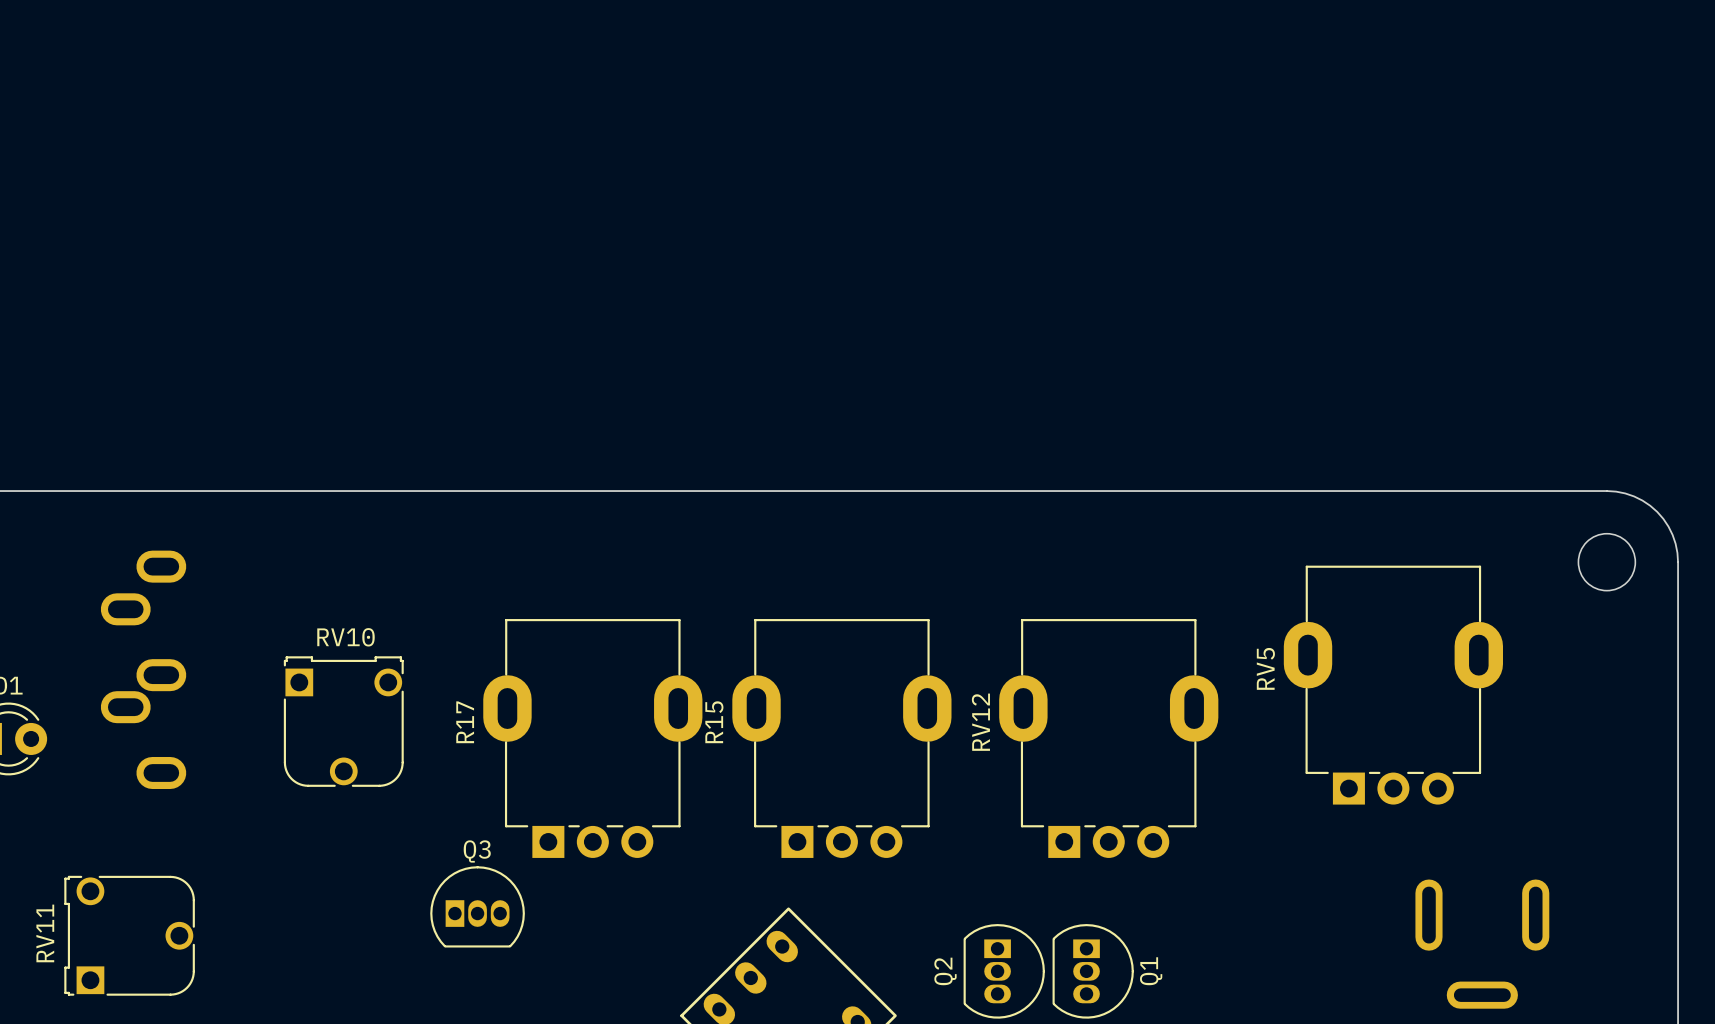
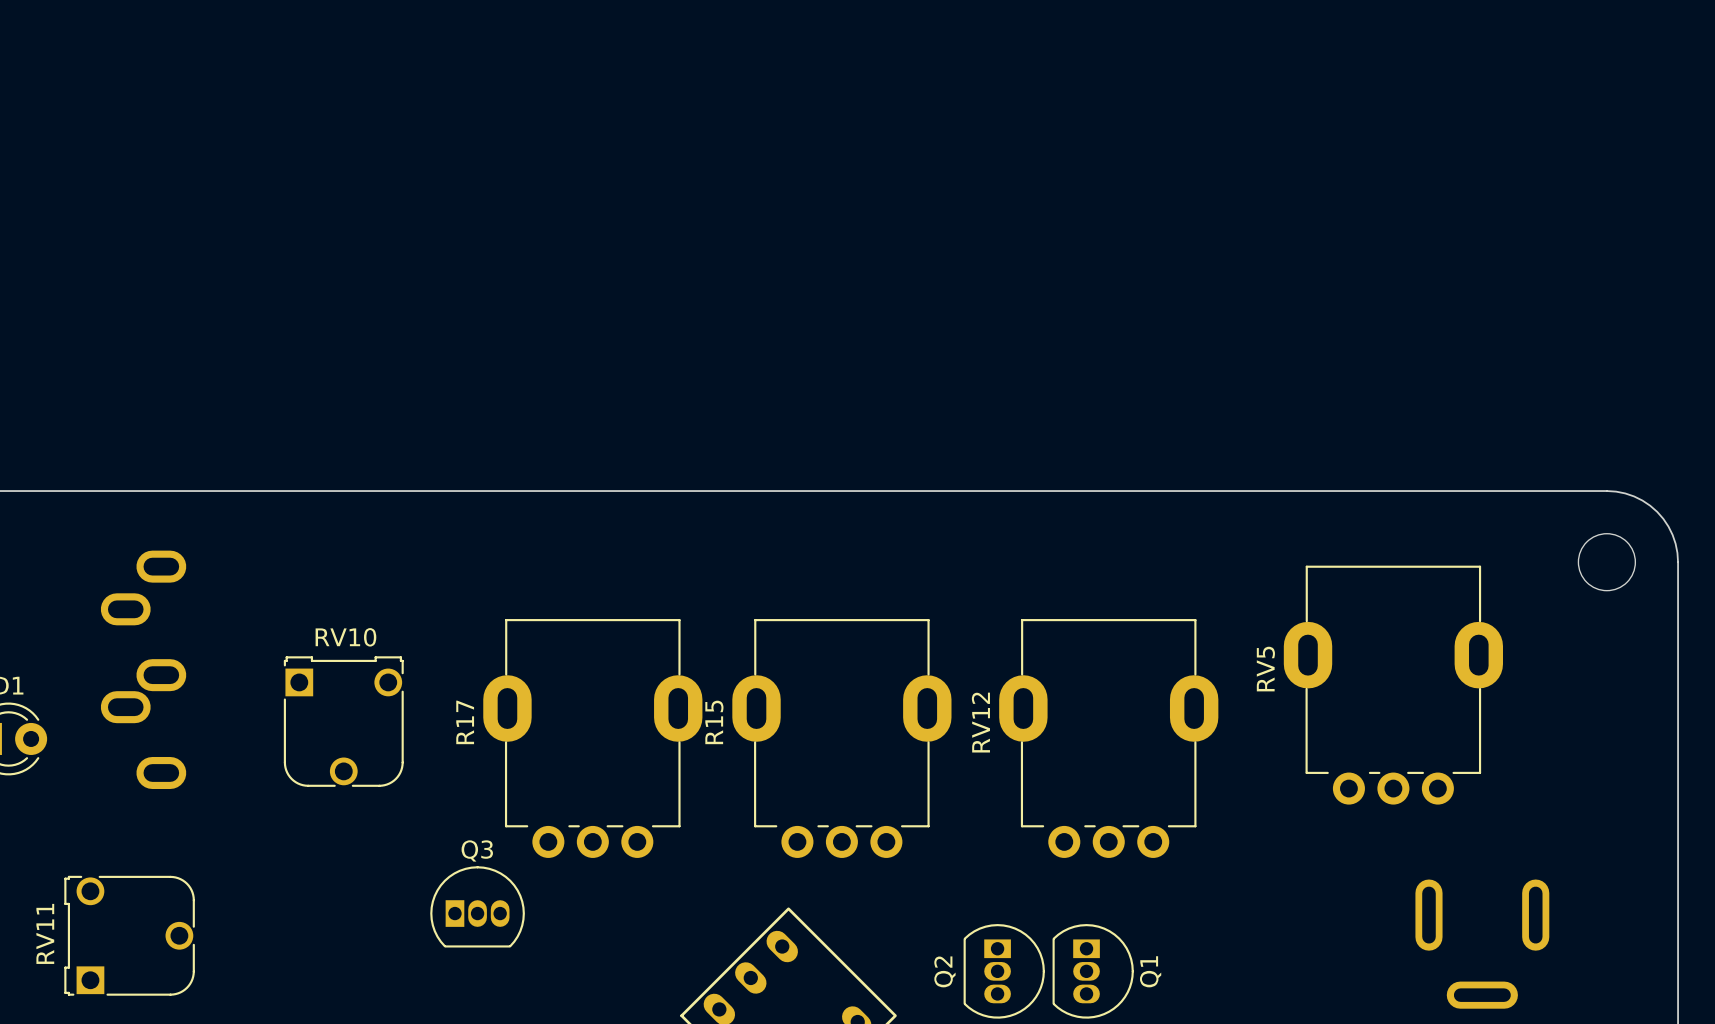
RV5 footprint: [1283, 565, 1503, 805] -> [1283, 565, 1503, 805]
R17 footprint: [483, 619, 703, 858] -> [483, 619, 703, 858]
R15 footprint: [732, 619, 952, 858] -> [732, 619, 952, 858]
RV12 footprint: [999, 619, 1219, 858] -> [999, 619, 1219, 858]

